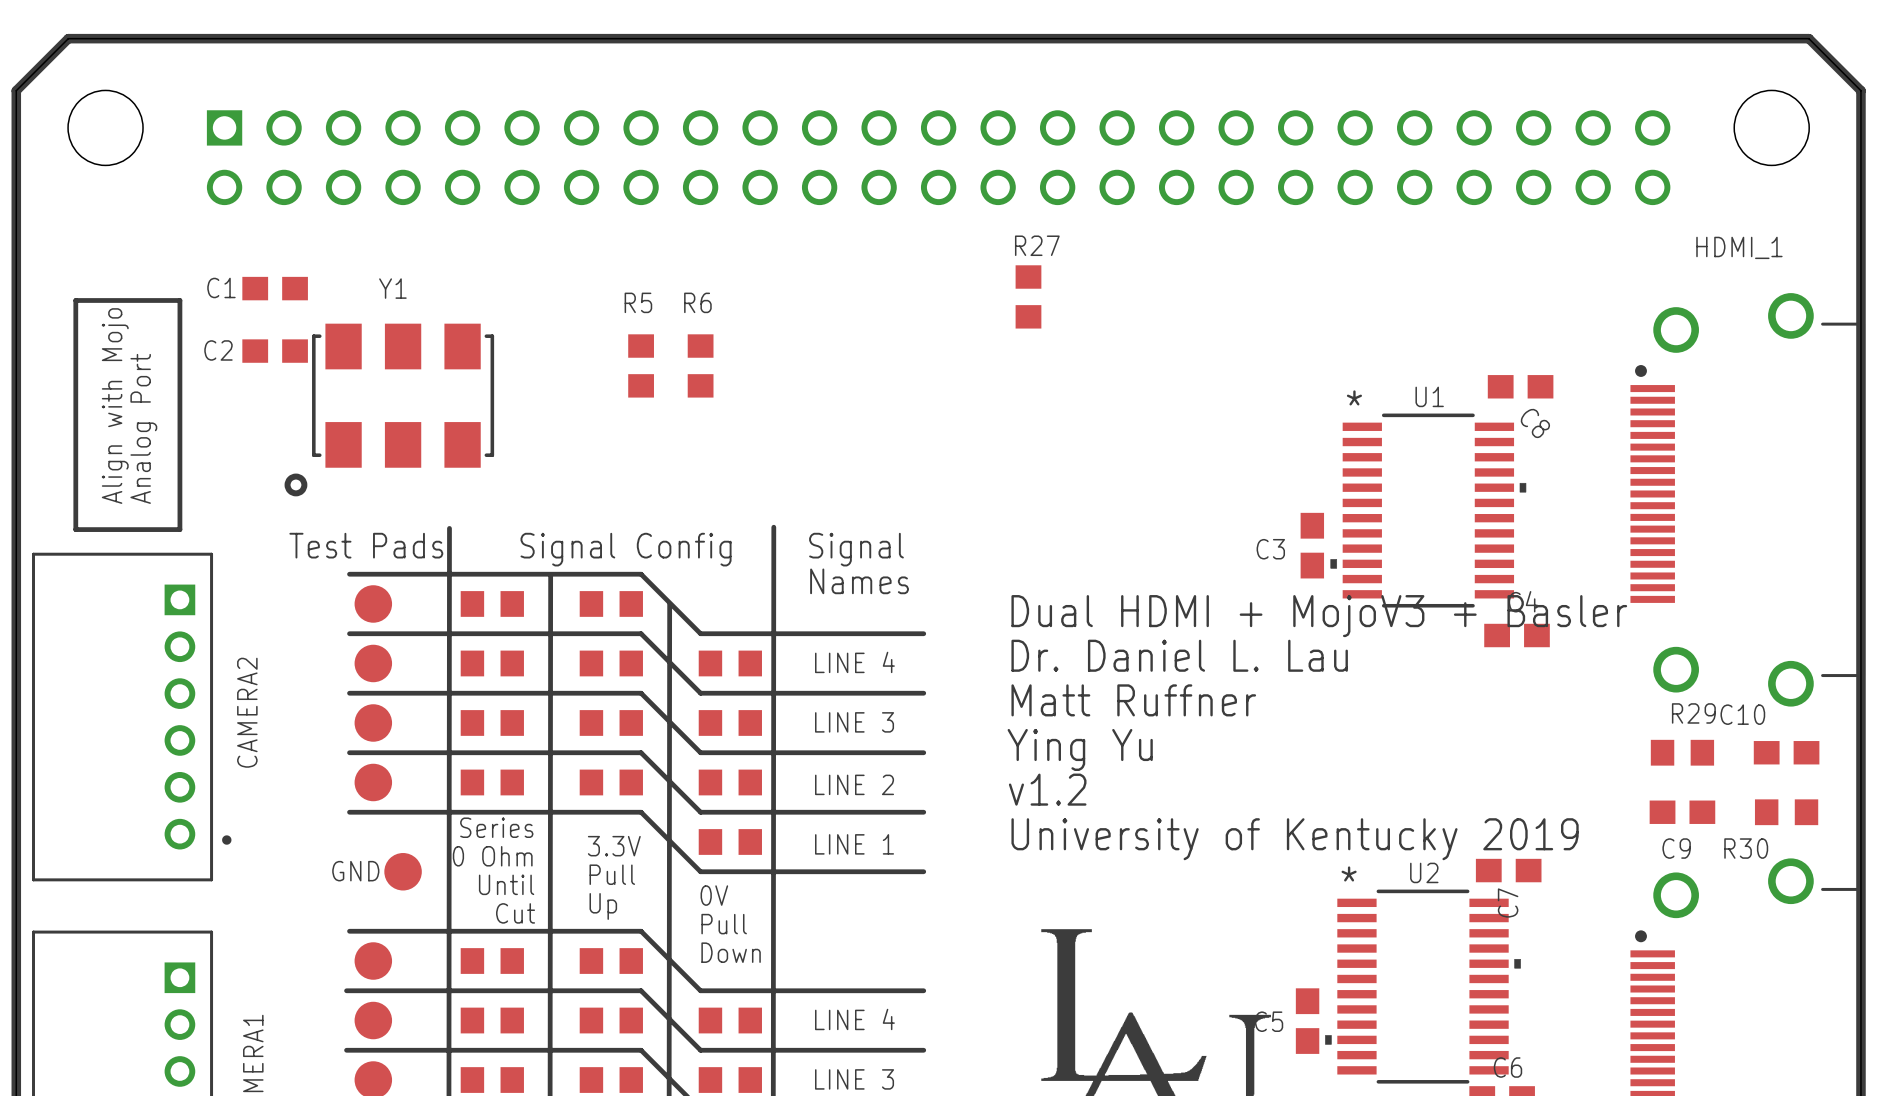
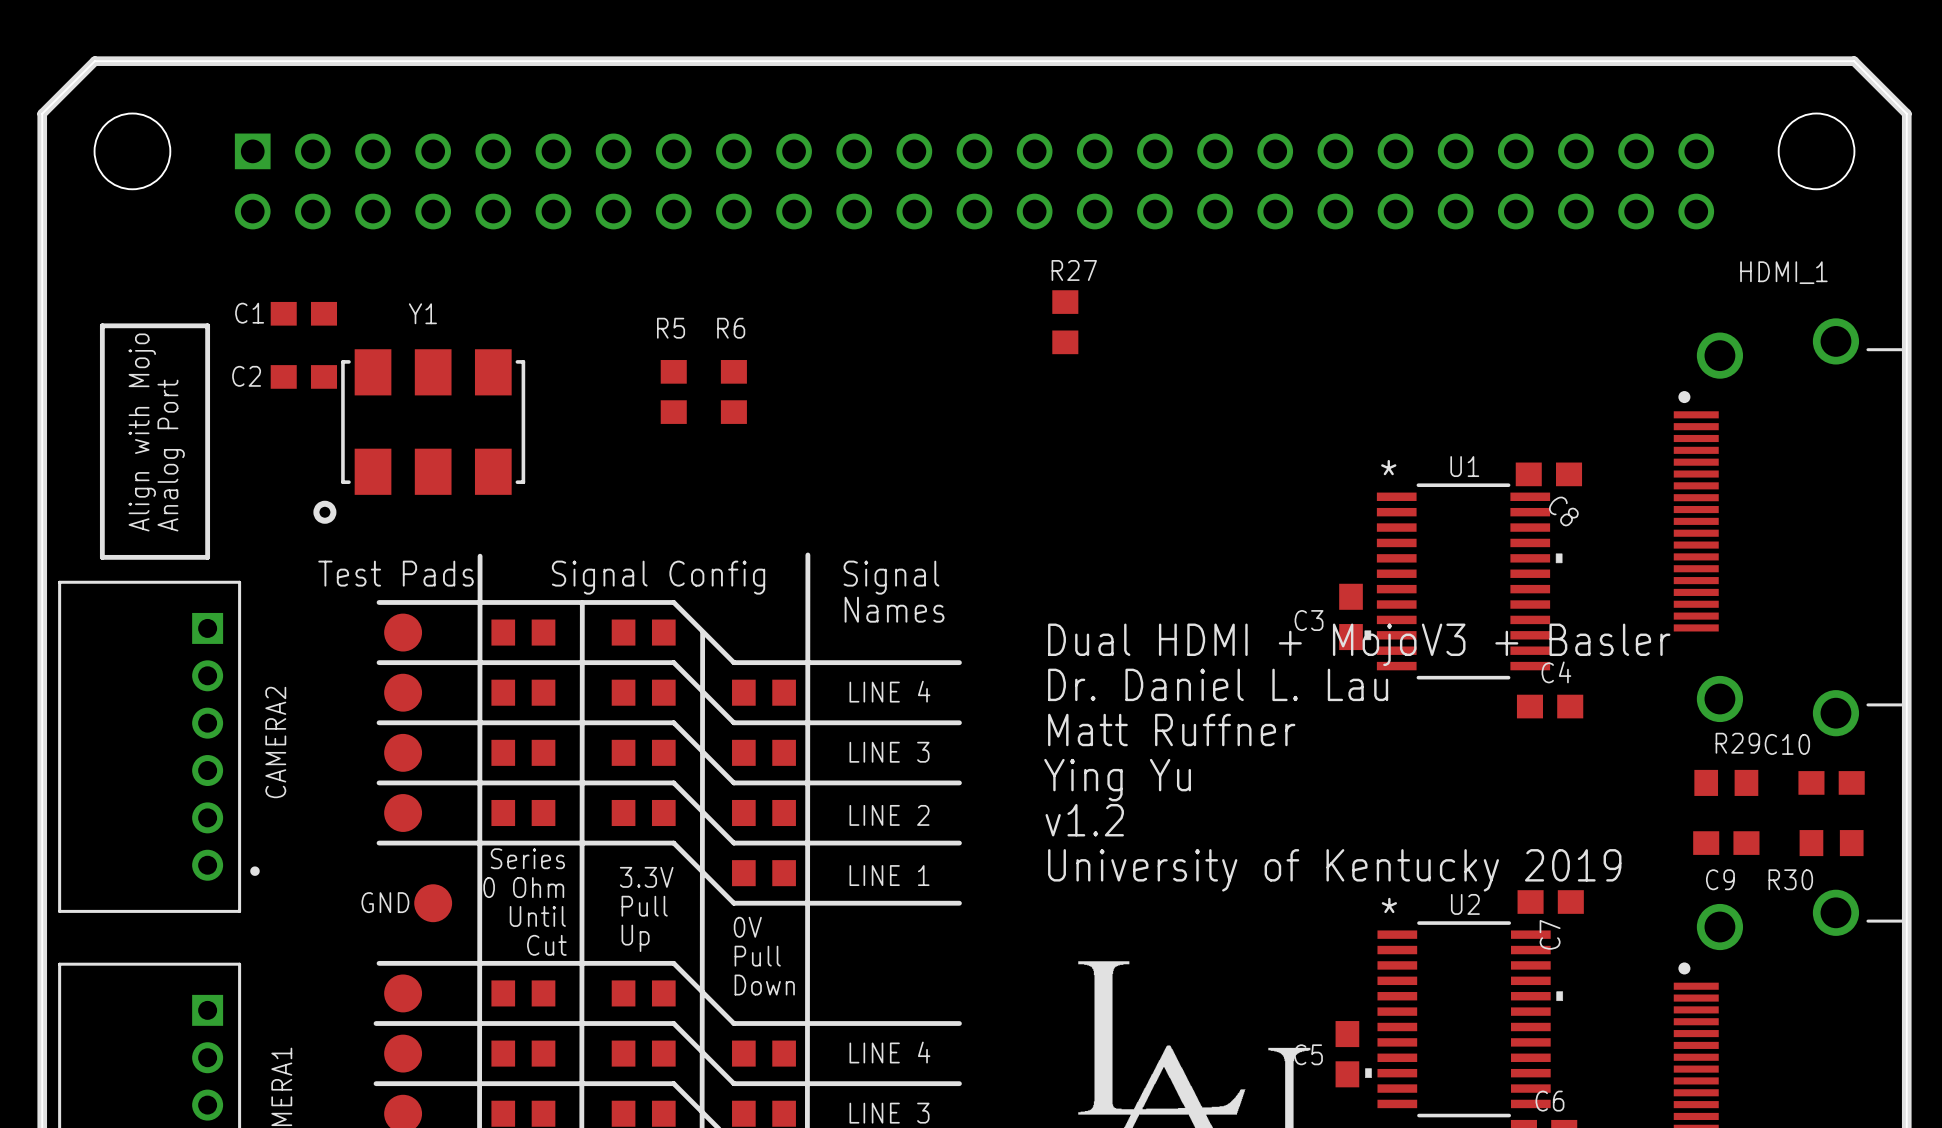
C8 position: (1520, 386) -> (1548, 474)
U1 position: (1428, 510) -> (1463, 581)
C3 position: (1312, 545) -> (1351, 616)
C4 position: (1517, 635) -> (1550, 706)

